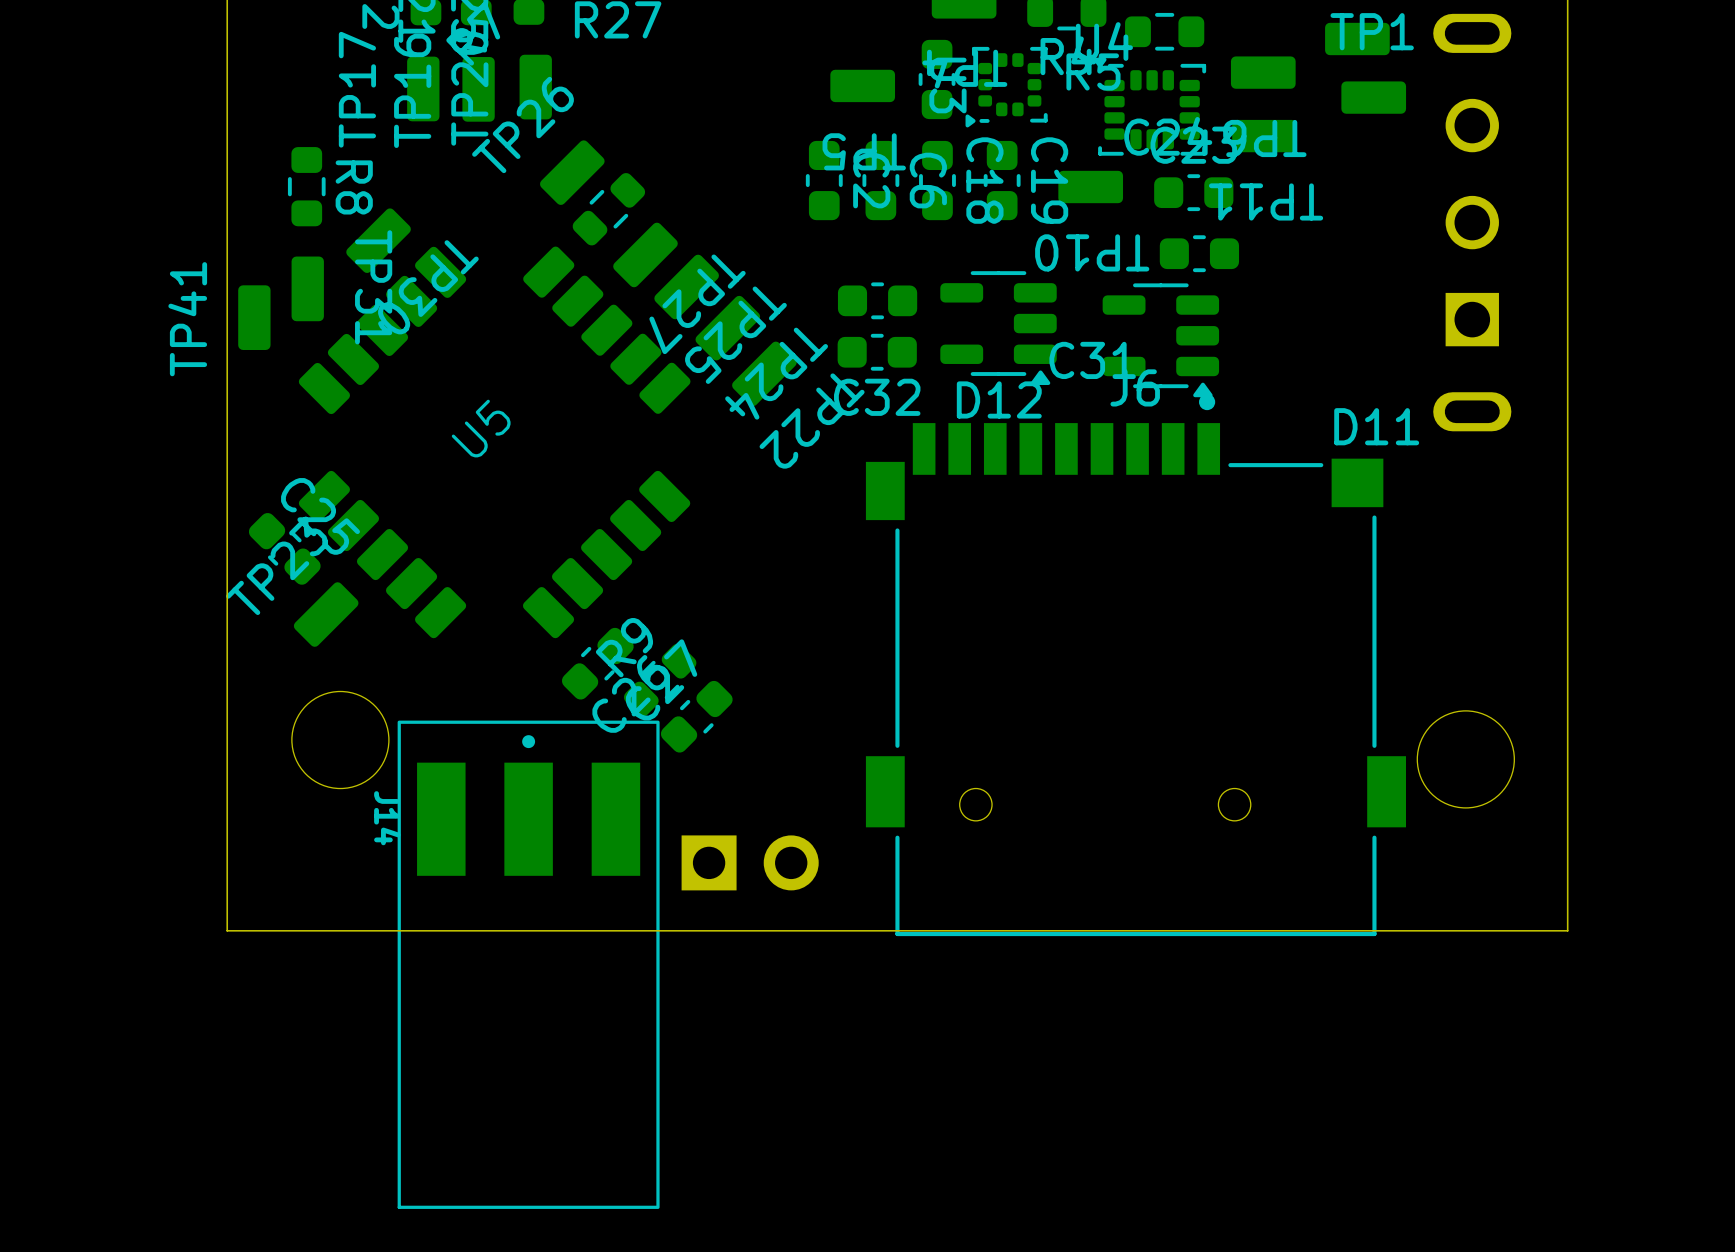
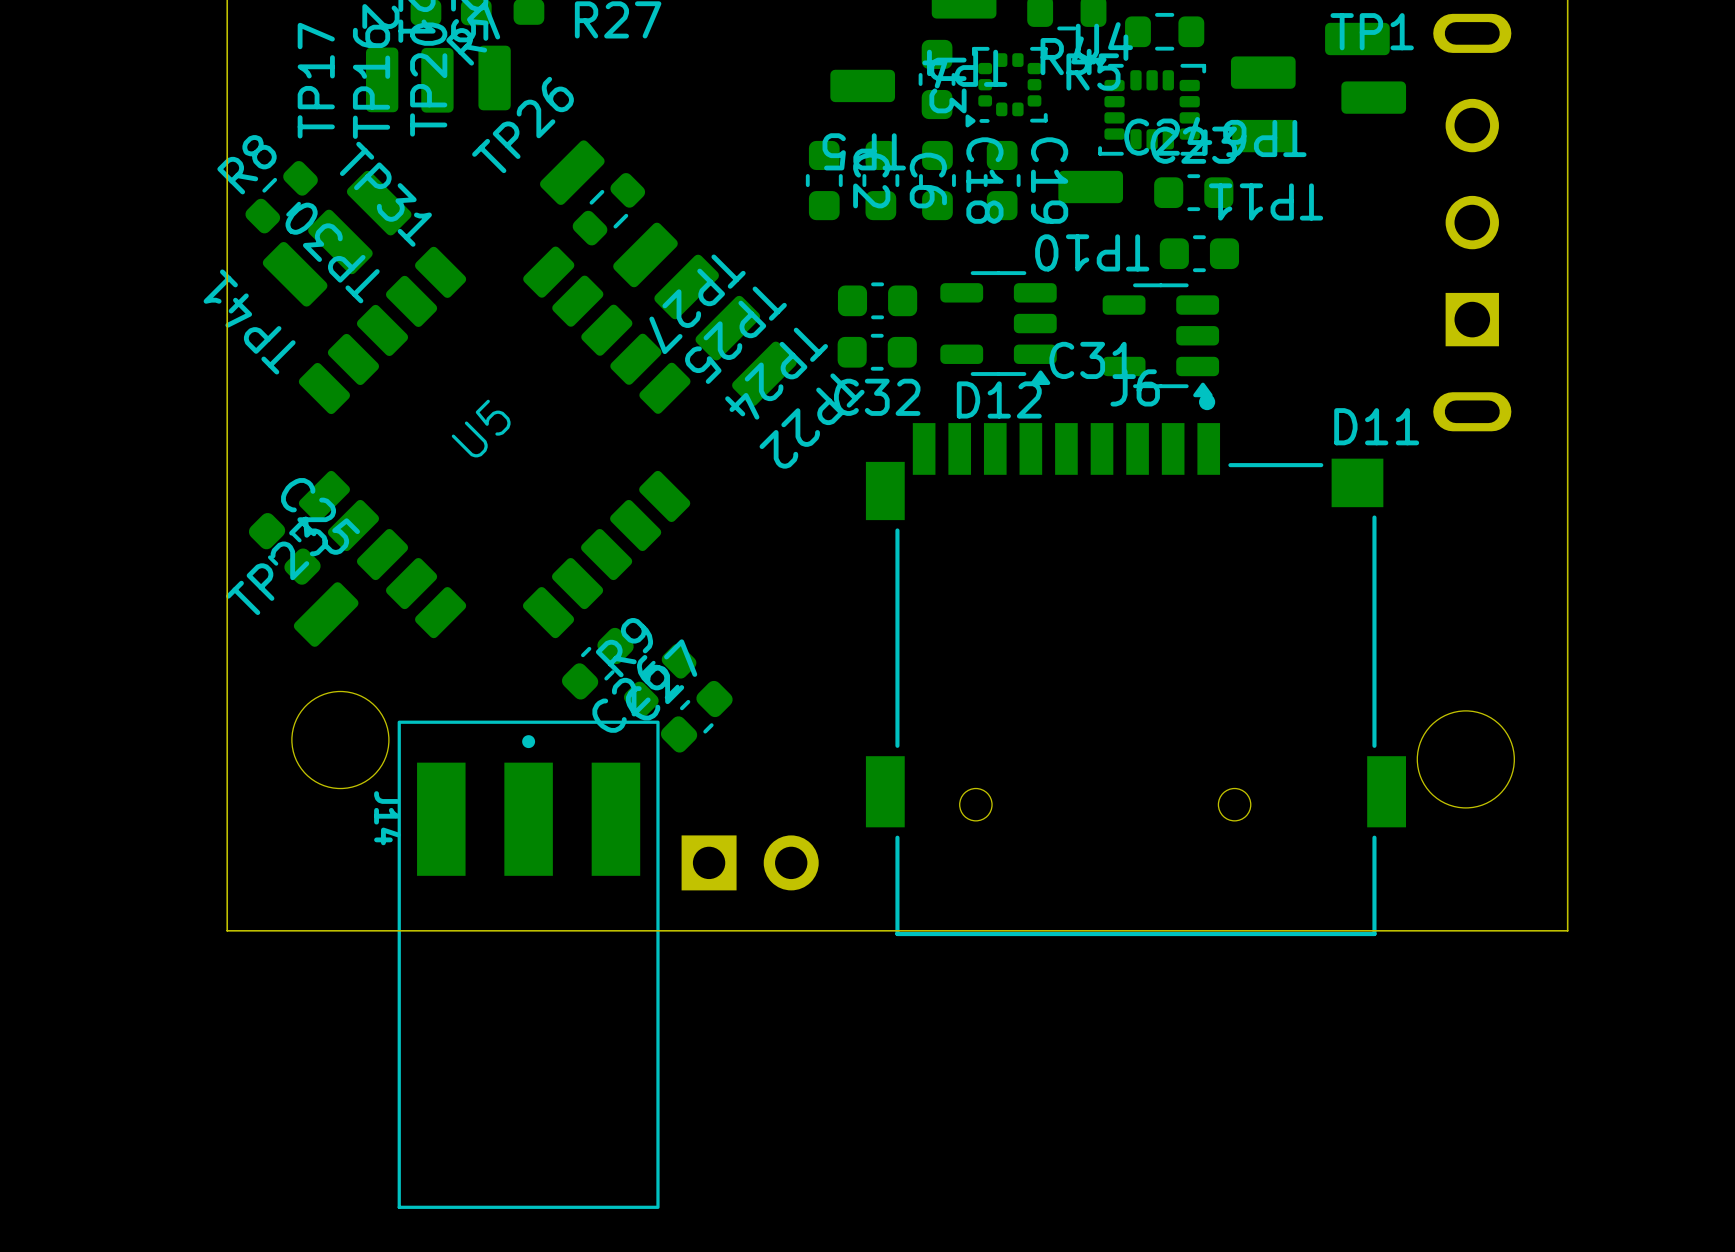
TP20 position: (535, 87) -> (494, 77)
TP17 position: (423, 88) -> (382, 79)
TP16 position: (478, 89) -> (437, 80)
R8 rotation: 0° (306, 186) -> 45° clockwise (281, 197)
R8 name position: R8 (354, 187) -> R8 (247, 164)
TP30 rotation: 0° (378, 240) -> 90° clockwise (379, 203)
TP31 rotation: 0° (307, 288) -> 45° counterclockwise (340, 241)
TP31 position: (307, 288) -> (340, 241)
TP41 rotation: 0° (254, 317) -> 45° counterclockwise (295, 274)
TP41 position: (254, 317) -> (295, 274)

